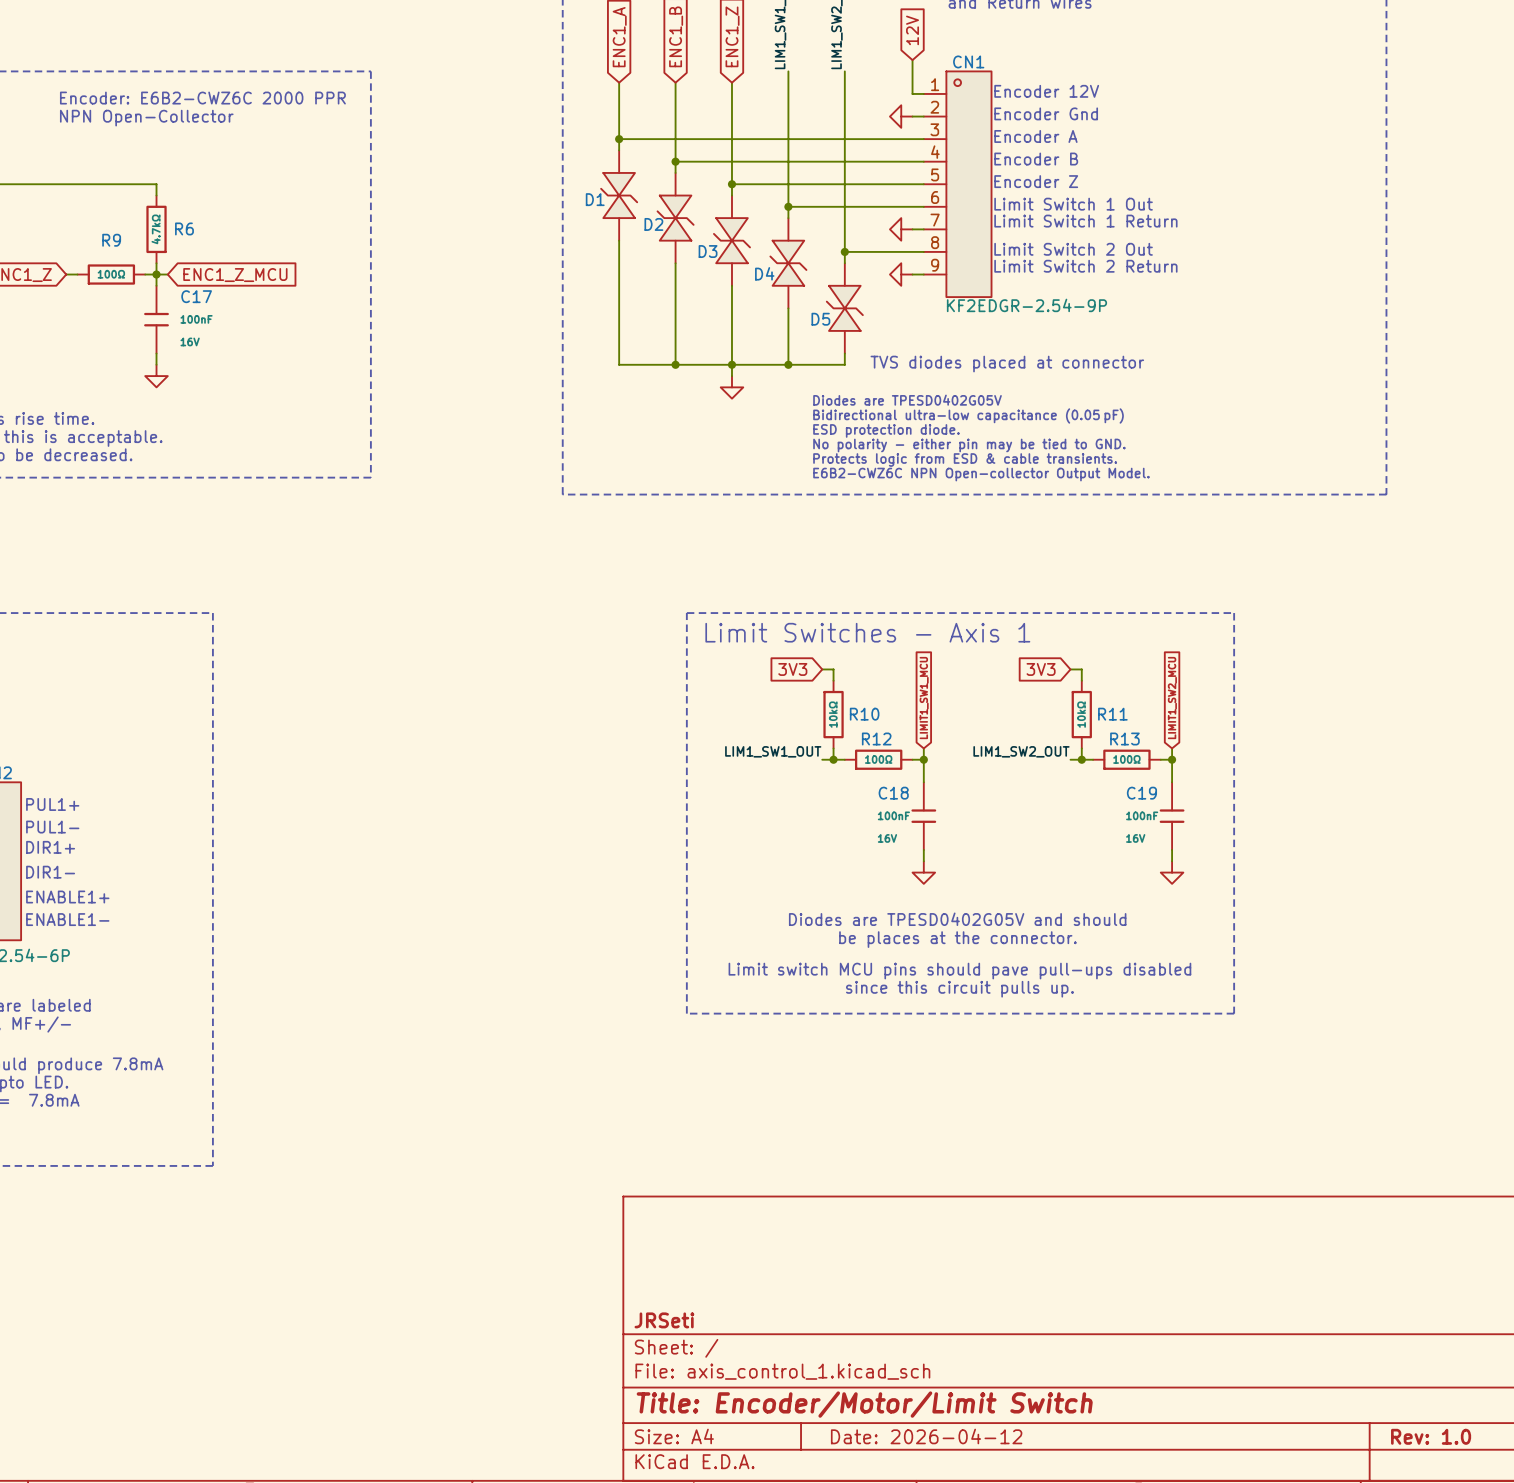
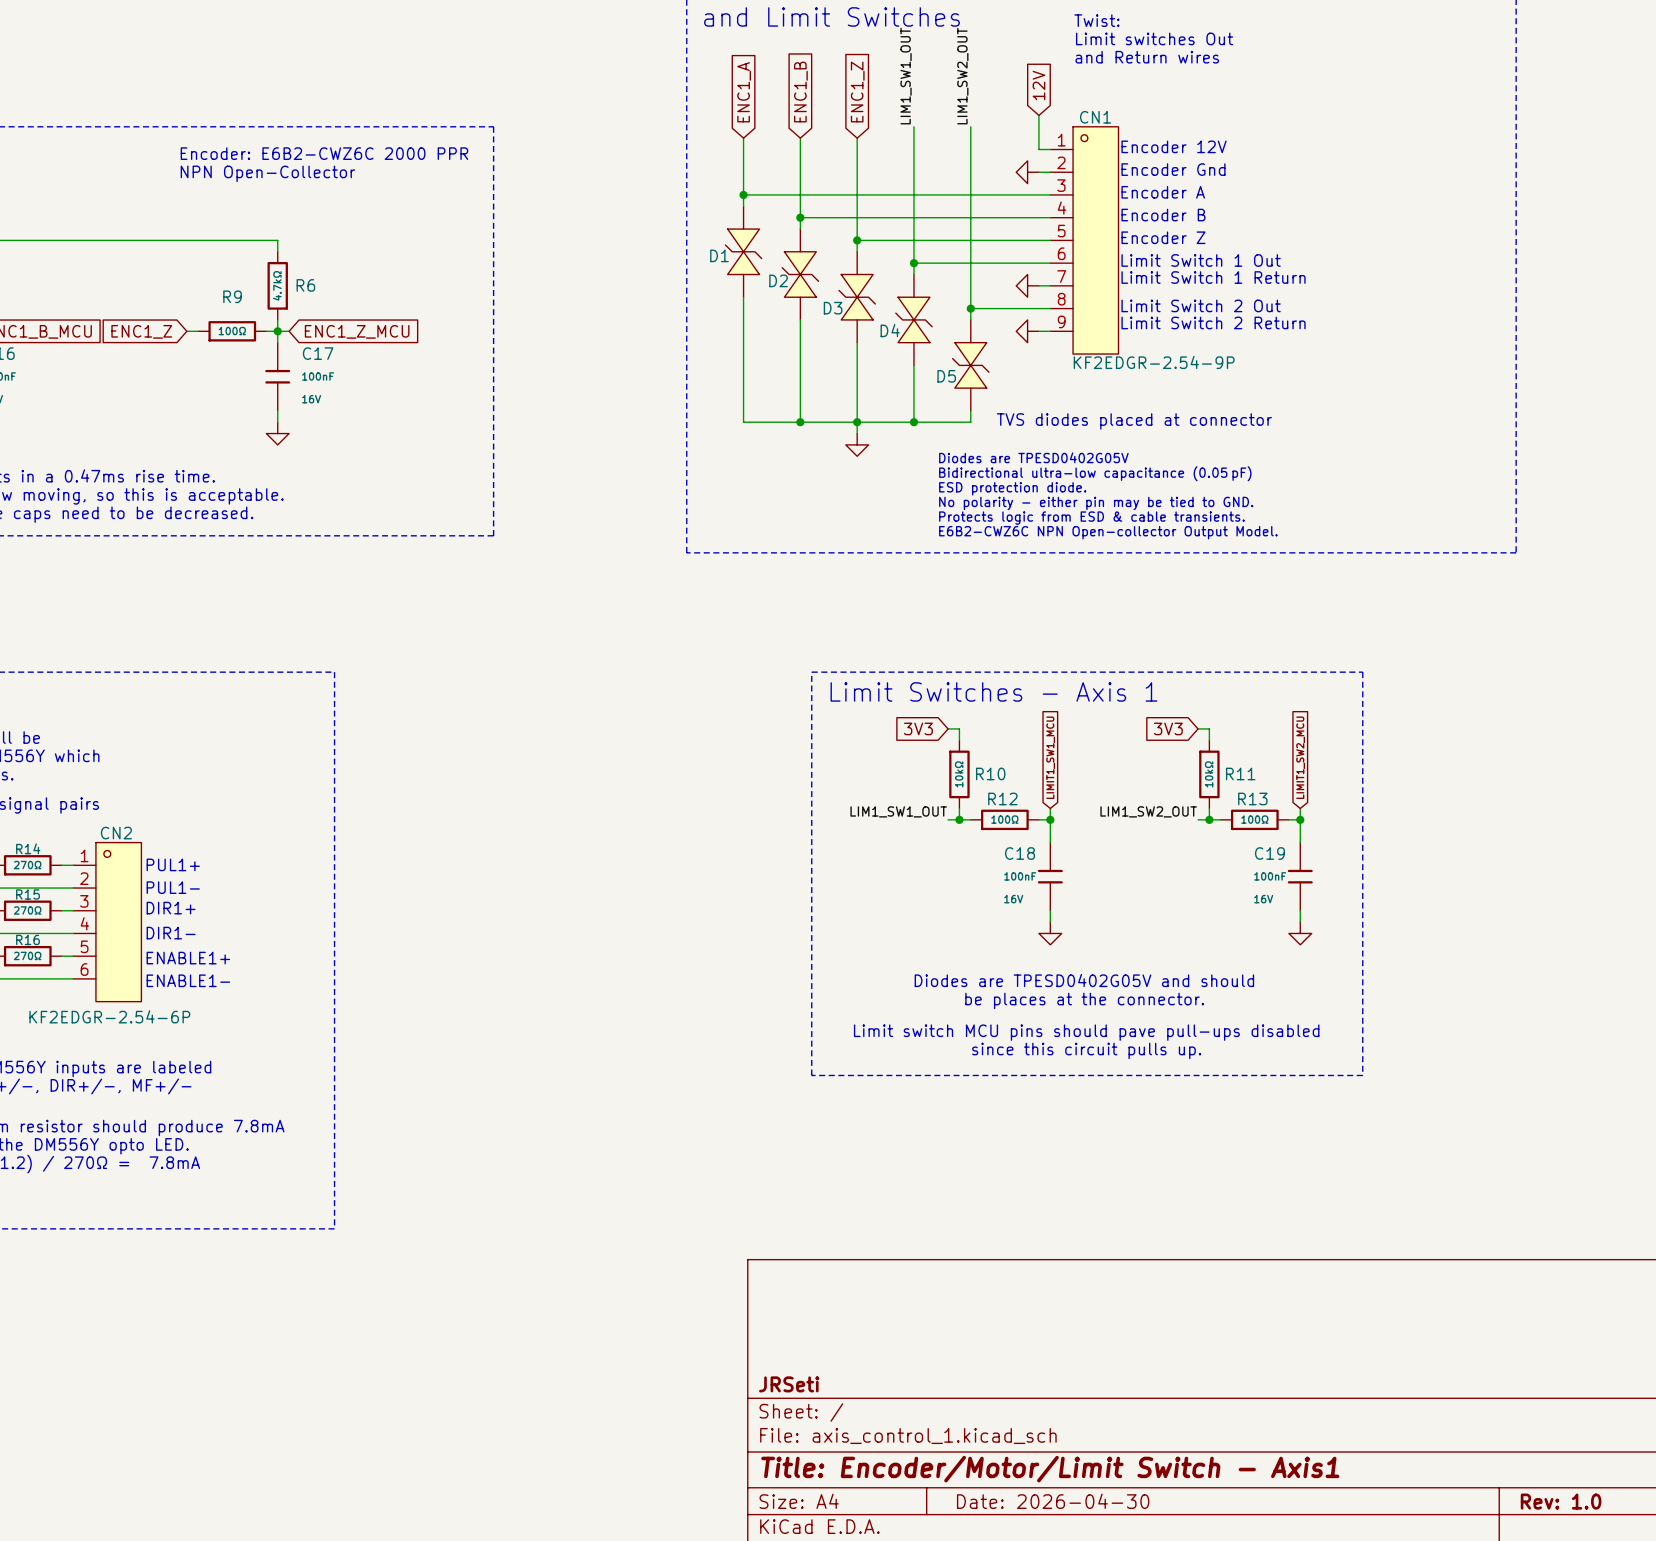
title block: Title: Encoder/Motor/Limit Switch (864, 1404) -> Title: Encoder/Motor/Limit Switch - Axis1 (1050, 1469)
title block: Date: 2026-04-12 (926, 1436) -> Date: 2026-04-30 (1053, 1501)

